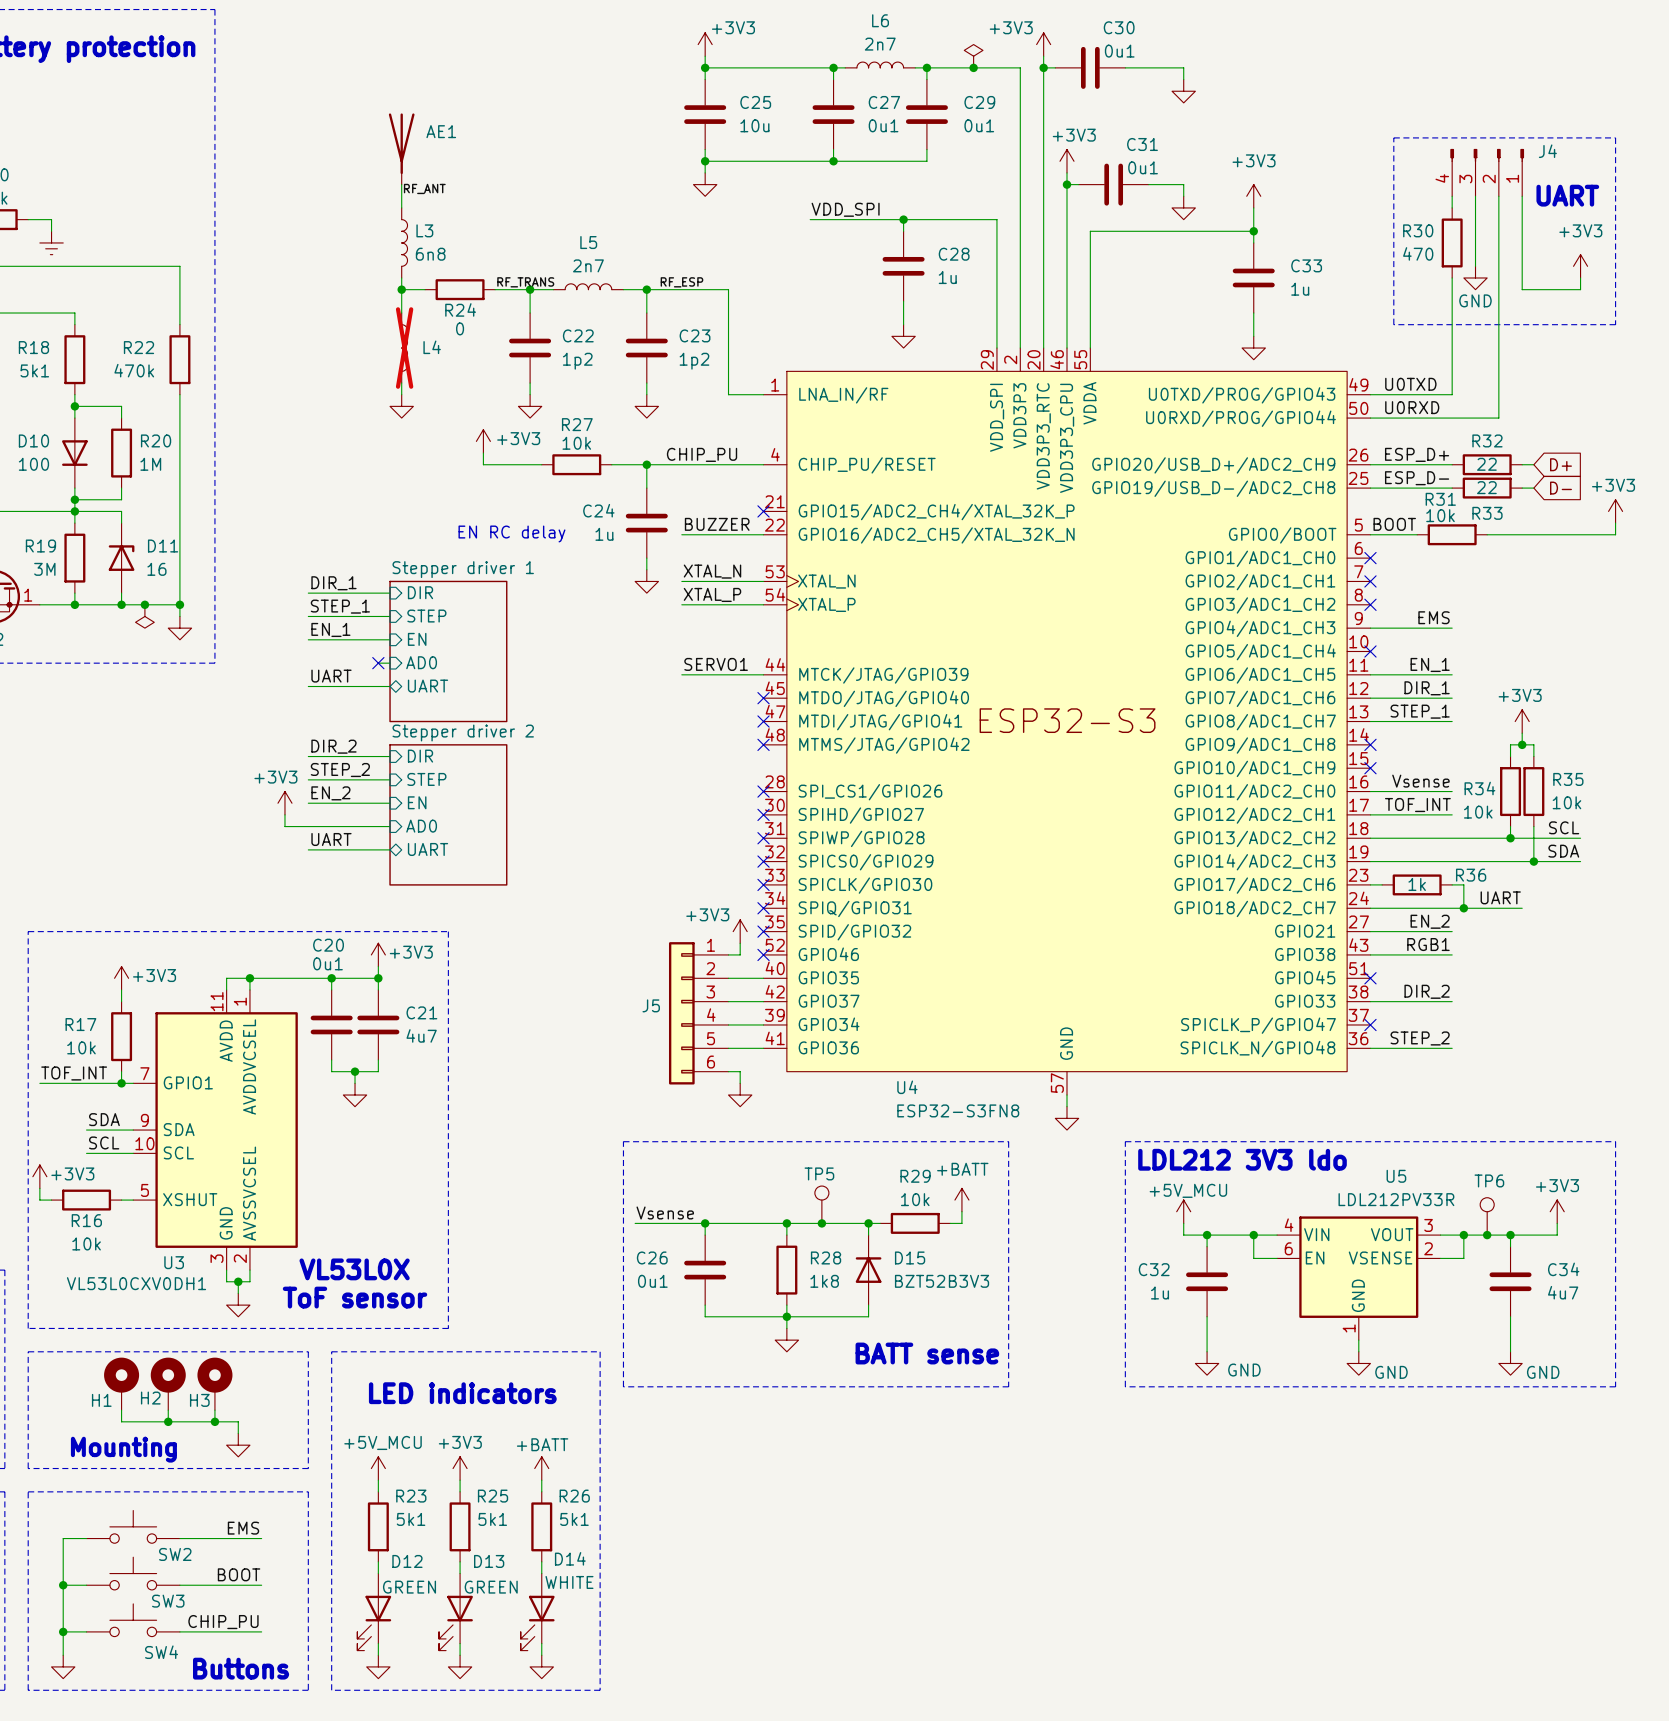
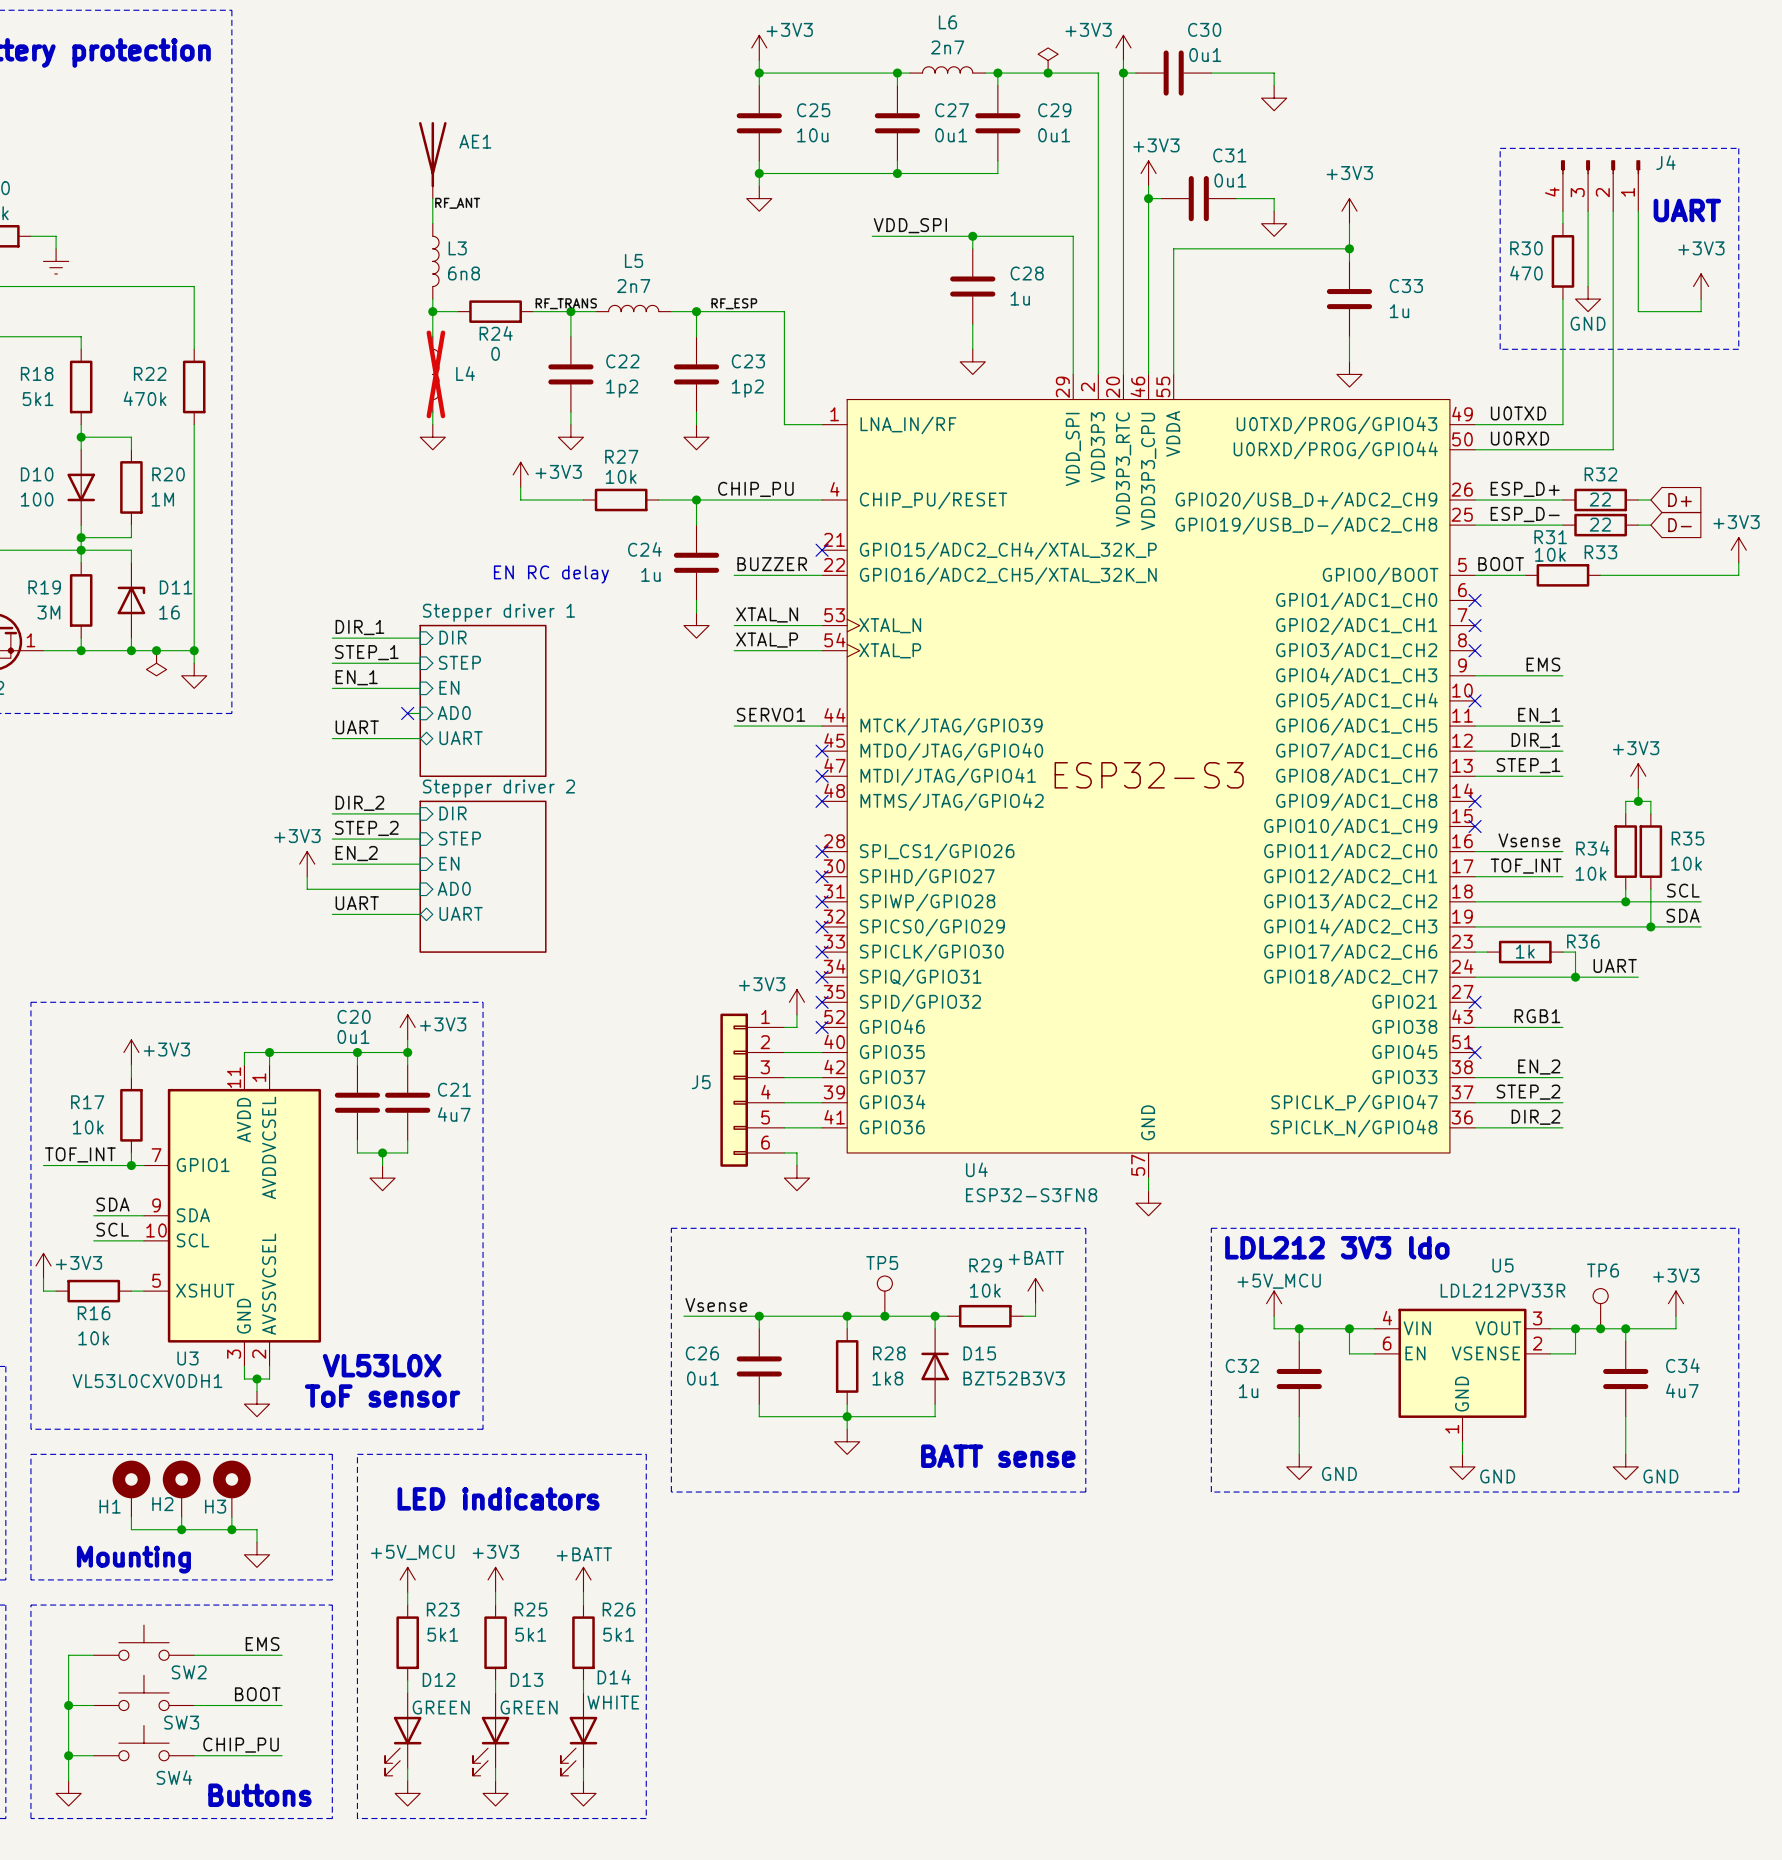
label: EN_2 (1430, 921) -> none
wire: (1370, 931) (1452, 931) -> (1475, 1102) (1562, 1102)
no-connect mark: none -> (1475, 1002)
label: DIR_2 (1427, 991) -> EN_2 (1539, 1067)
label: none -> STEP_2 (1528, 1092)
no-connect mark: (1370, 1024) -> none
label: STEP_2 (1420, 1038) -> DIR_2 (1535, 1117)

